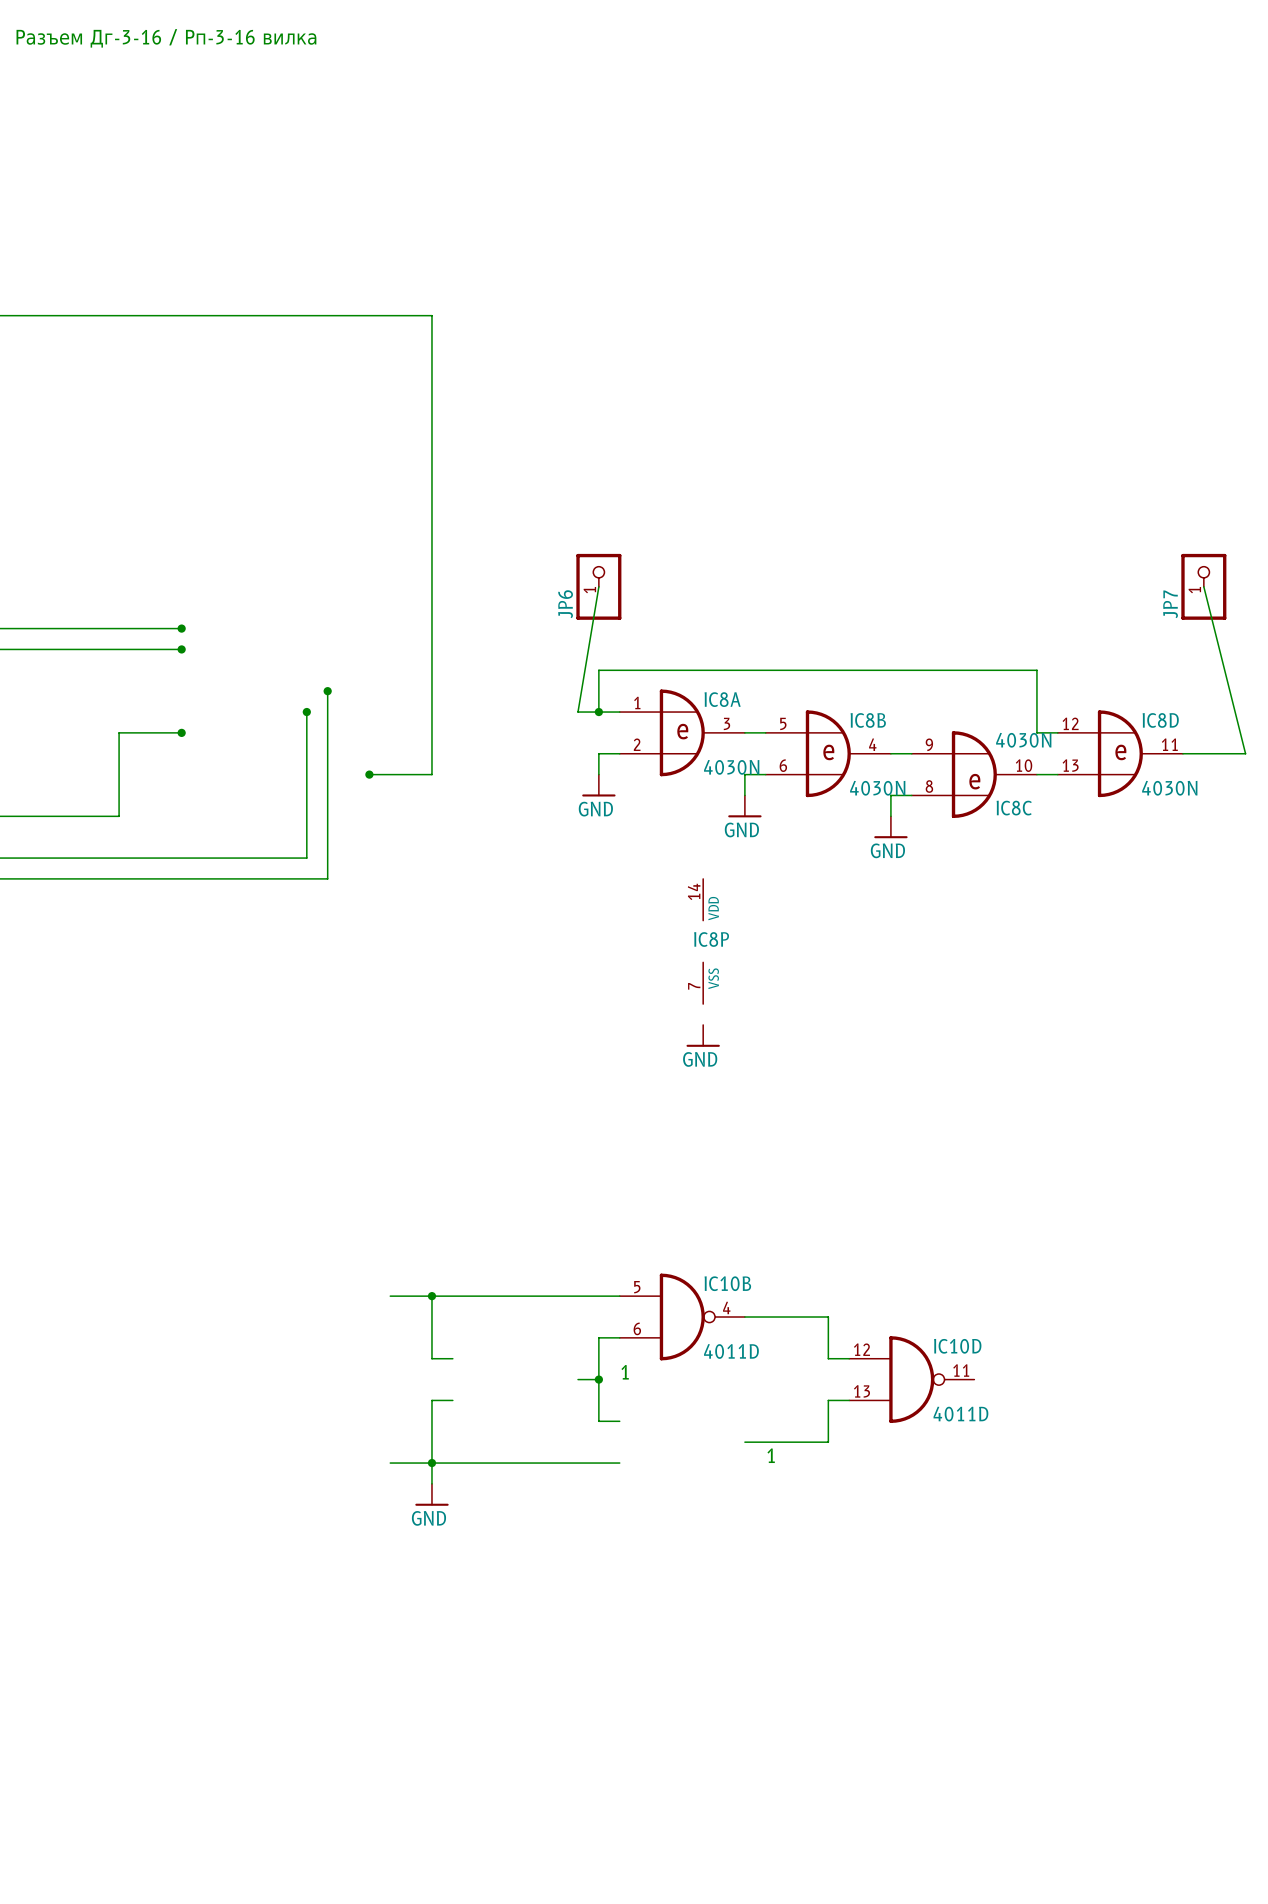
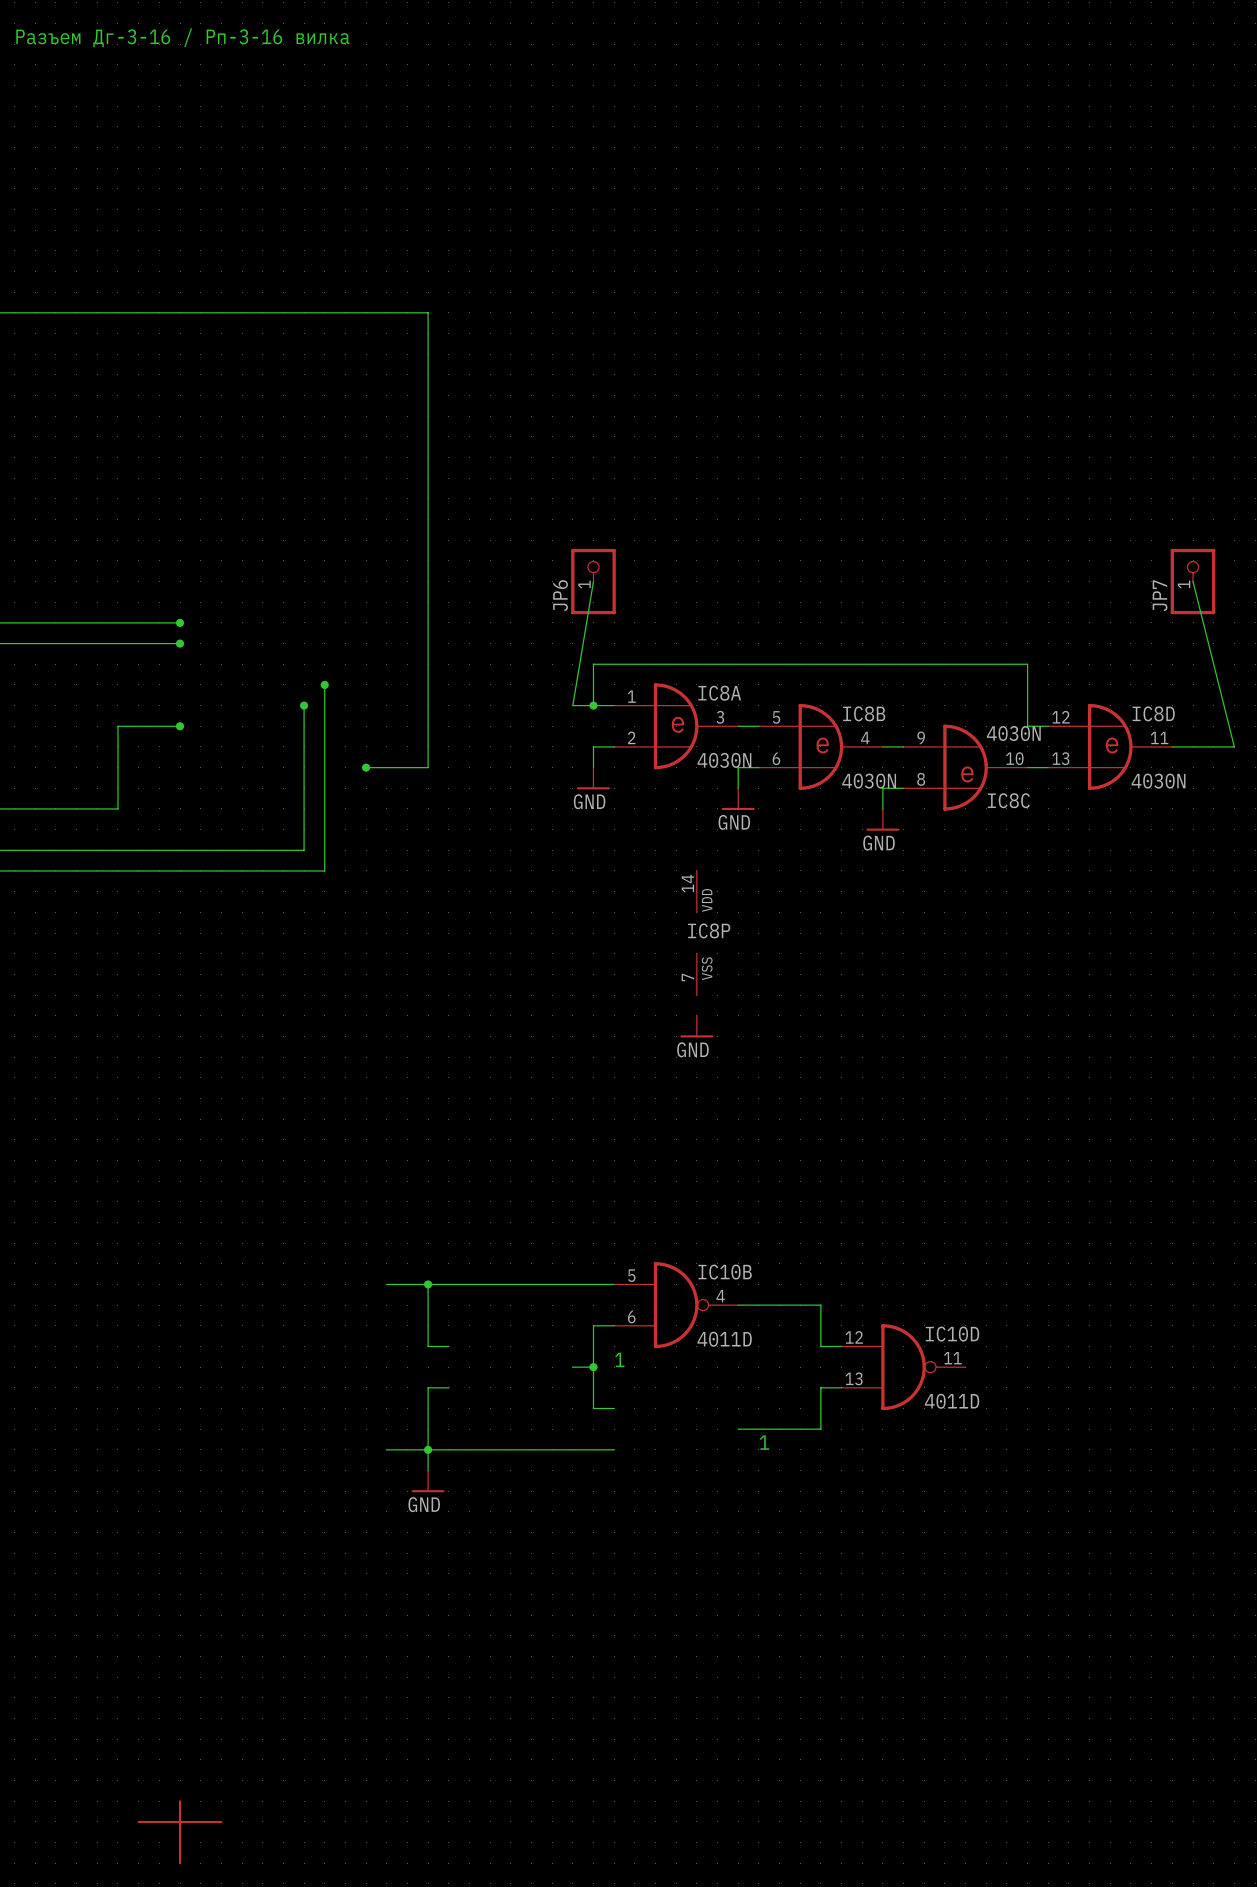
part: none -> (180, 1832)

